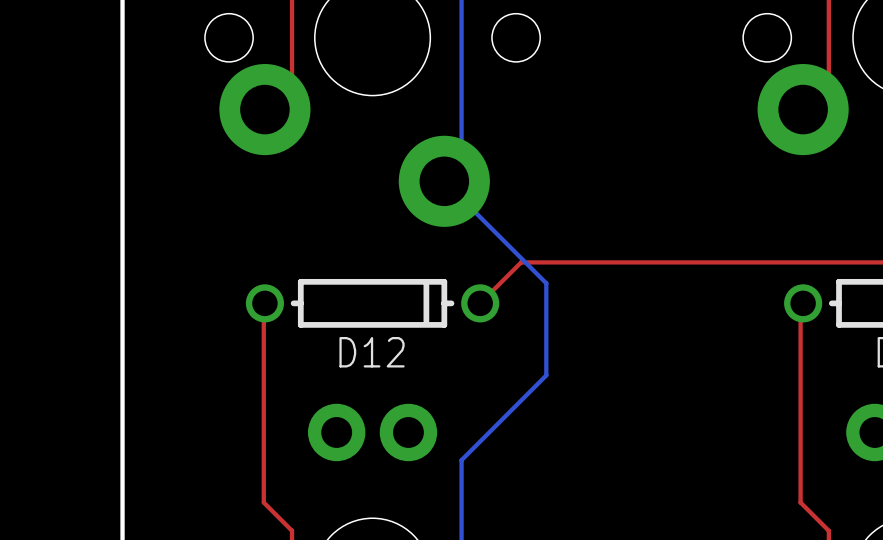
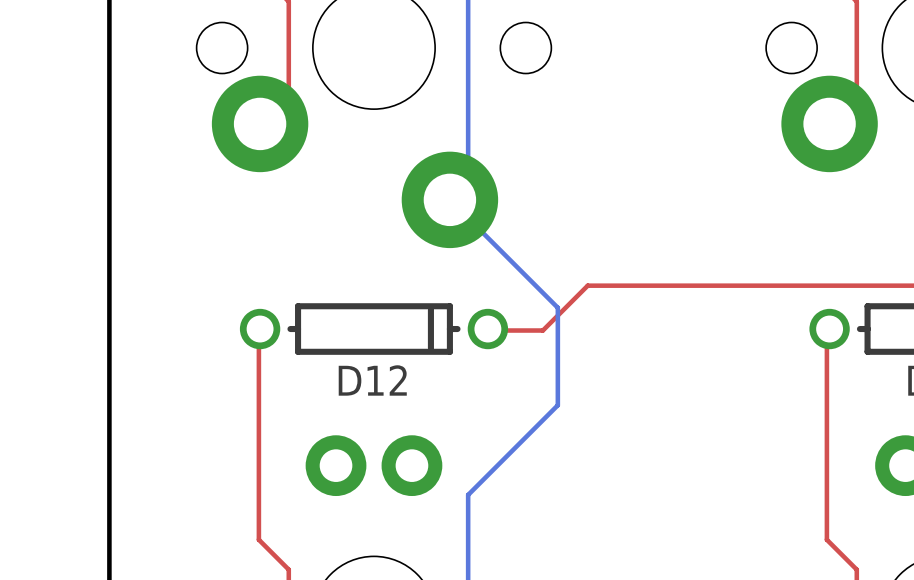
top track: (574, 262) (521, 262) (480, 303) -> (587, 285) (542, 330) (492, 330)

